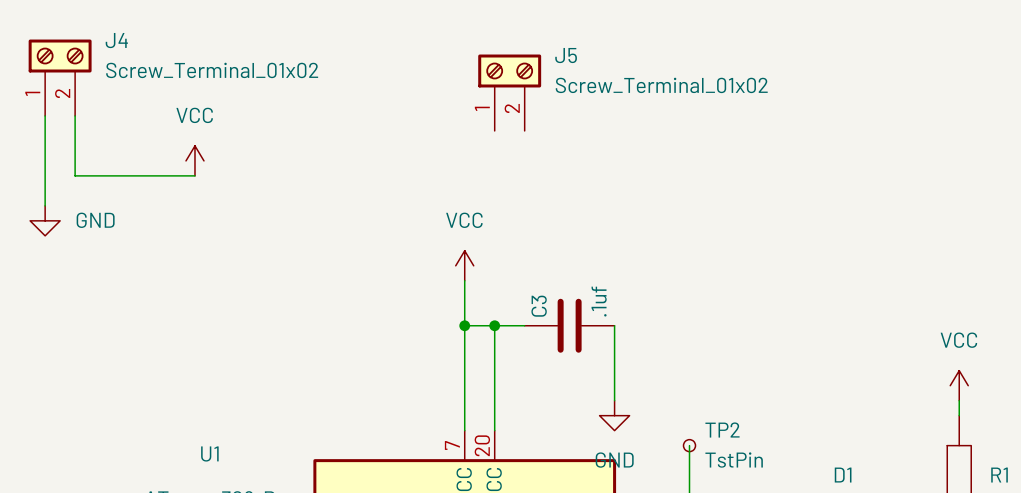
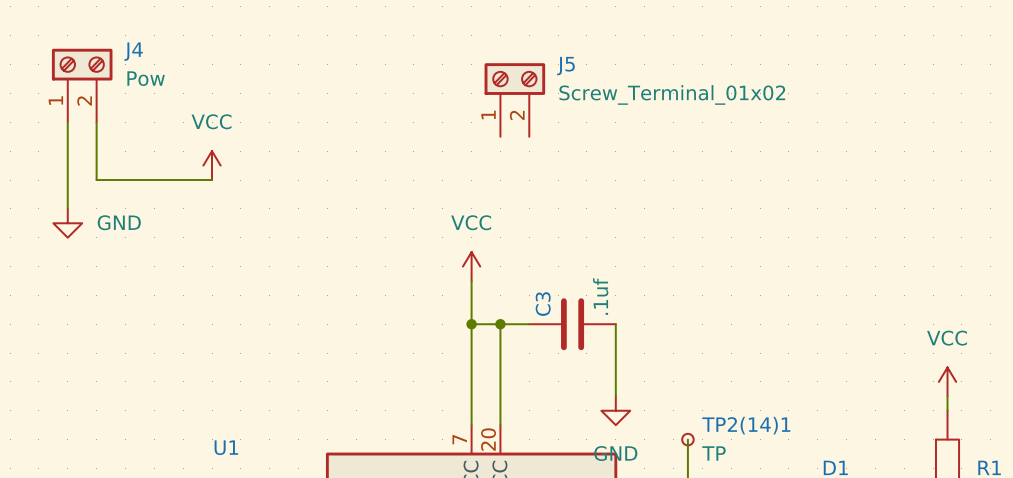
J4 value: Screw_Terminal_01x02 (212, 70) -> Pow (146, 78)
TP2 name: TP2 (722, 430) -> TP2(14)1 (746, 425)
TP2 value: TstPin (734, 460) -> TP (713, 453)

